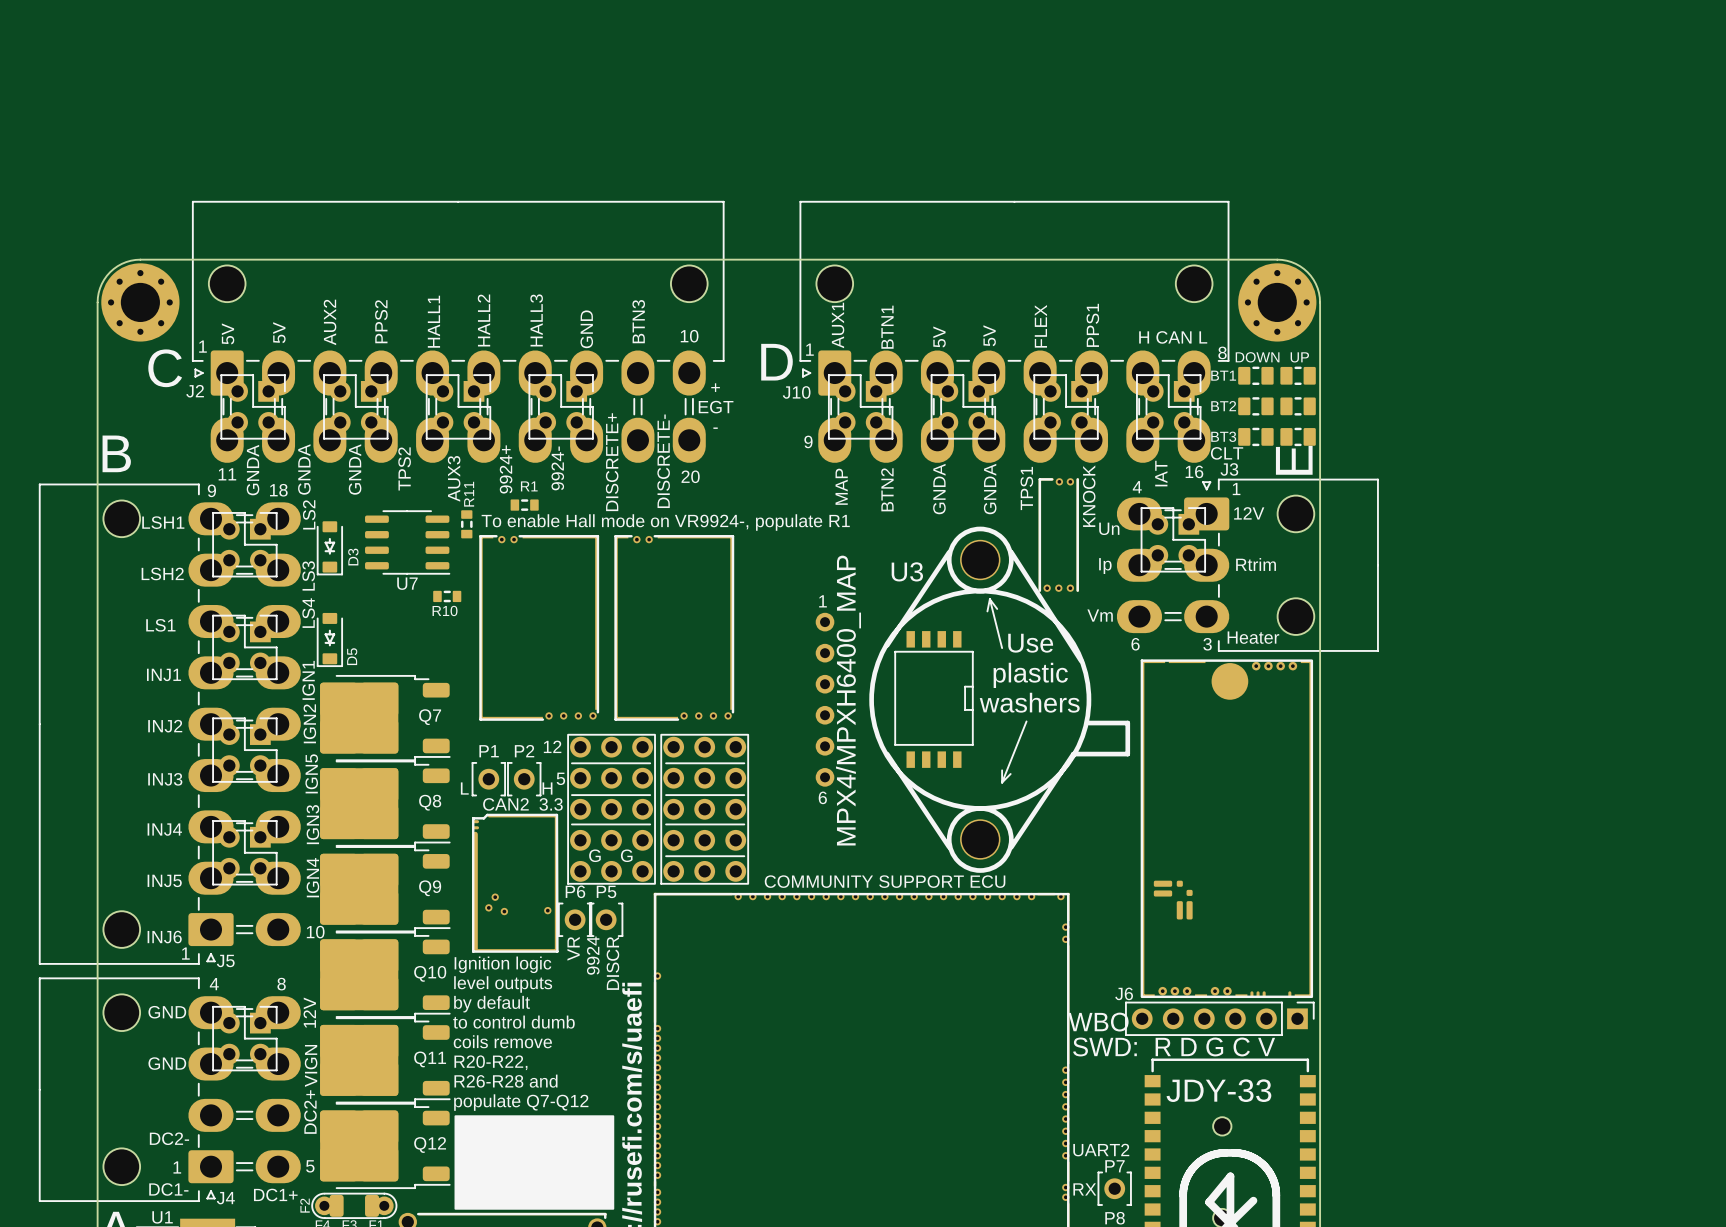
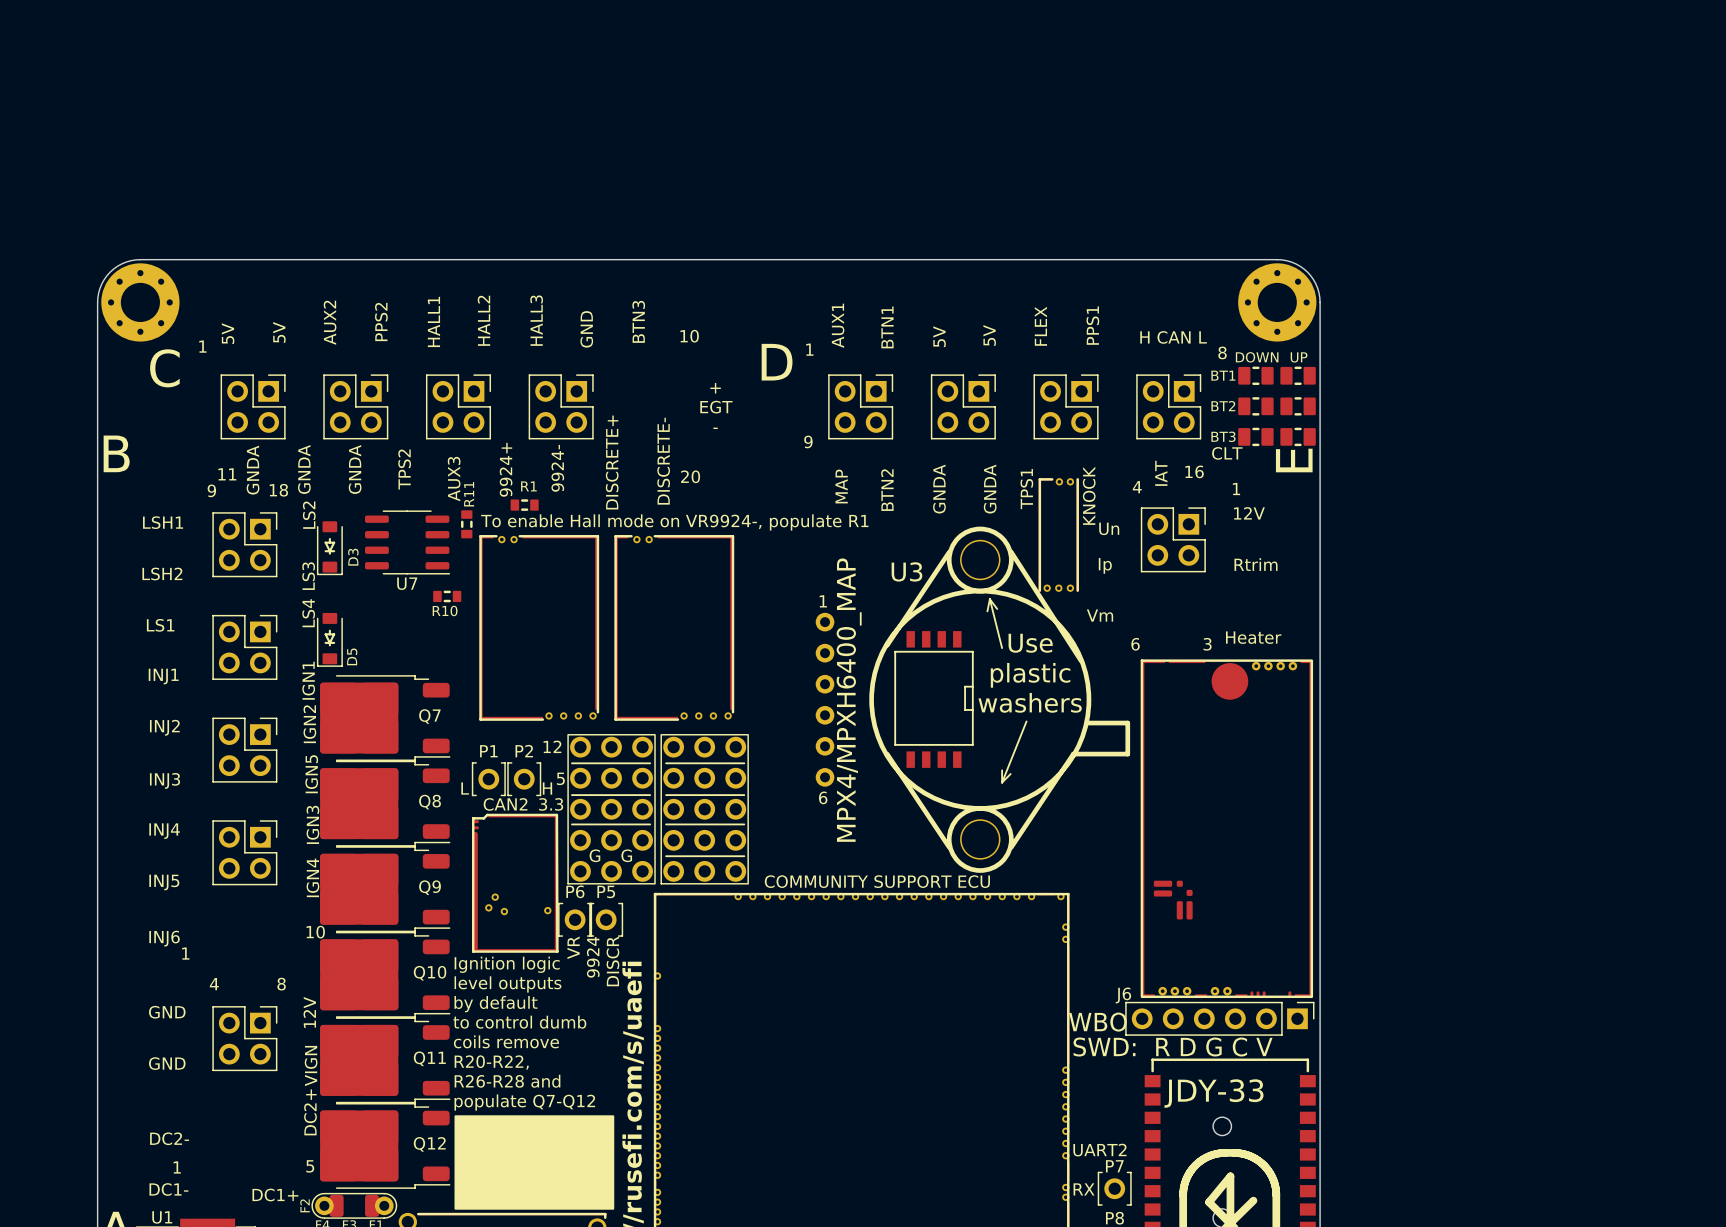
J2: (458, 331) -> none
J10: (1014, 331) -> none
J3: (1247, 565) -> none
J5: (169, 724) -> none
J4: (169, 1089) -> none

